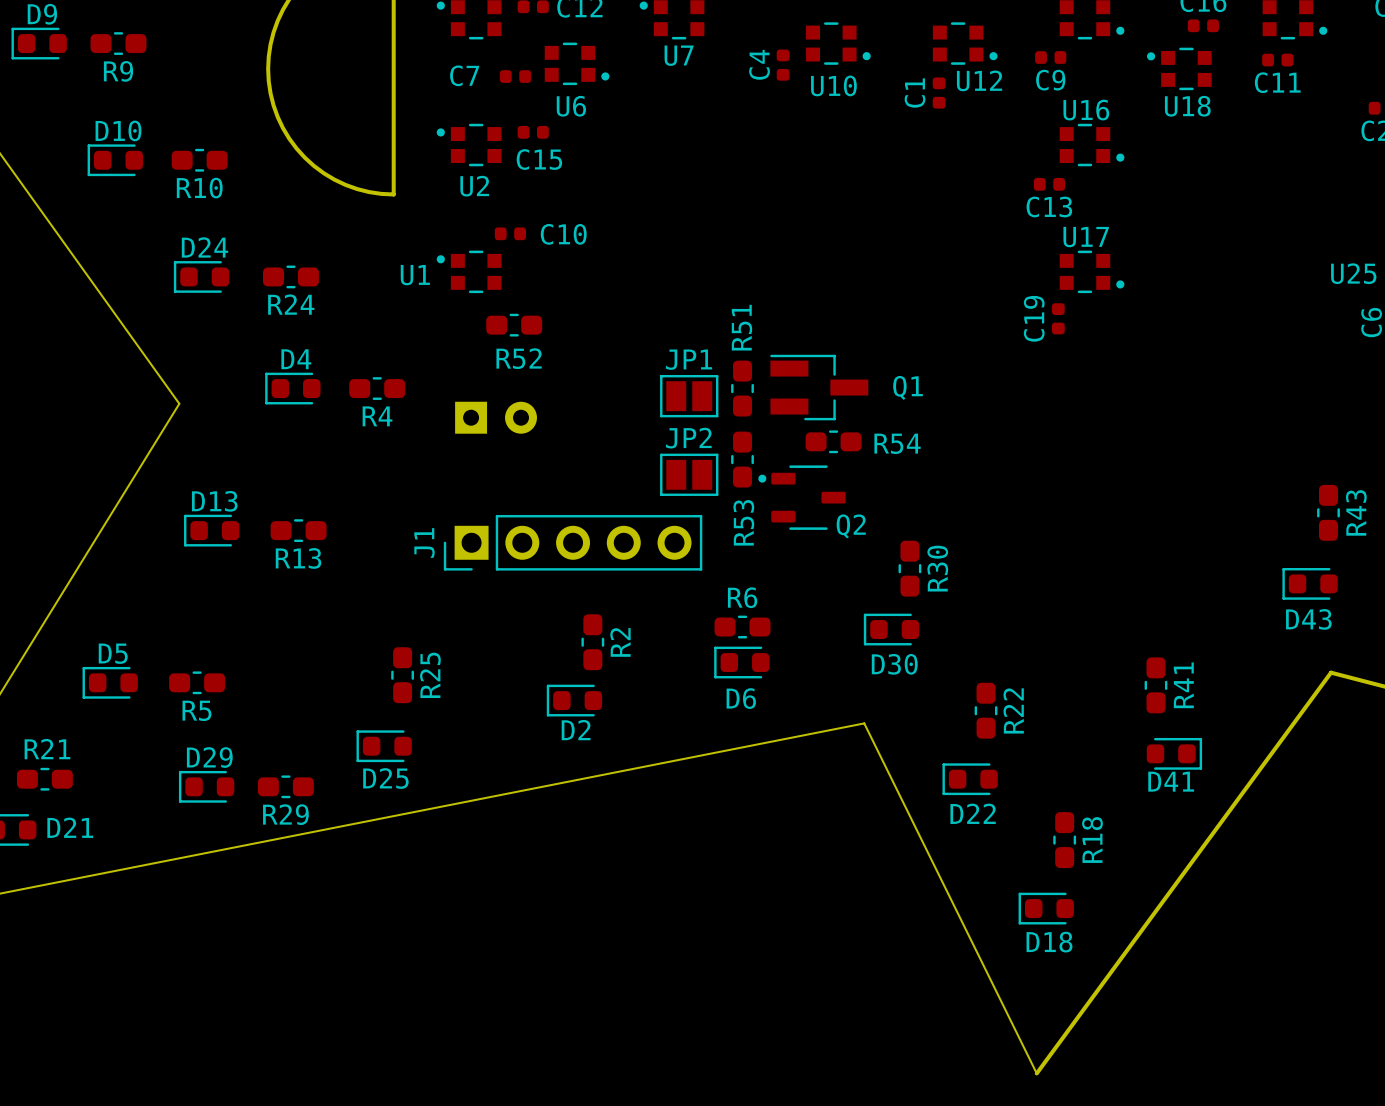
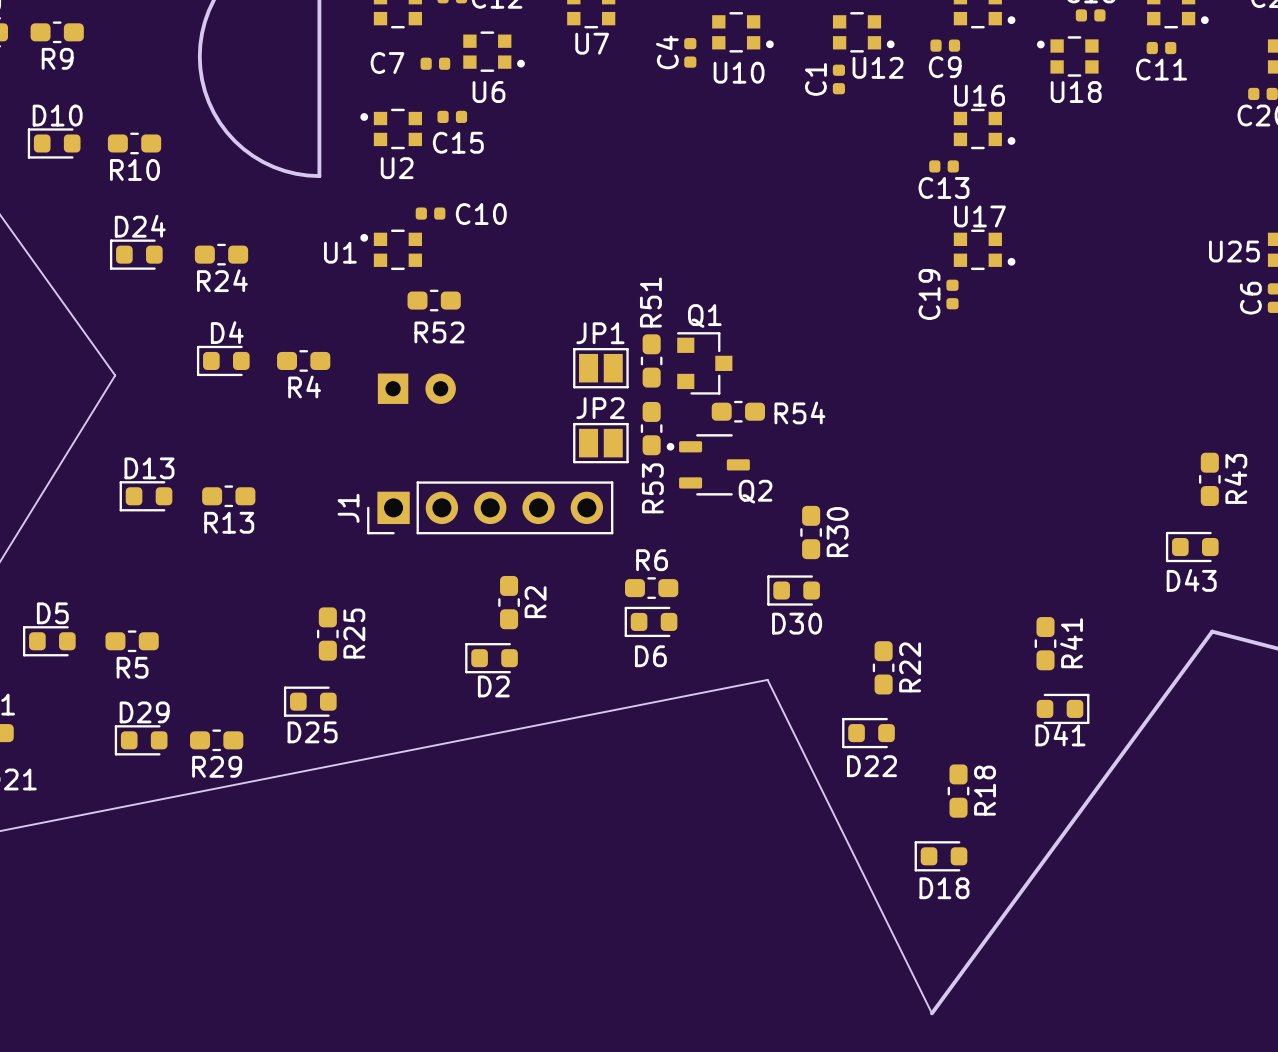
Q1 footprint: [770, 354, 869, 421] -> [677, 332, 733, 395]
Q1 name position: Q1 (908, 387) -> Q1 (704, 316)

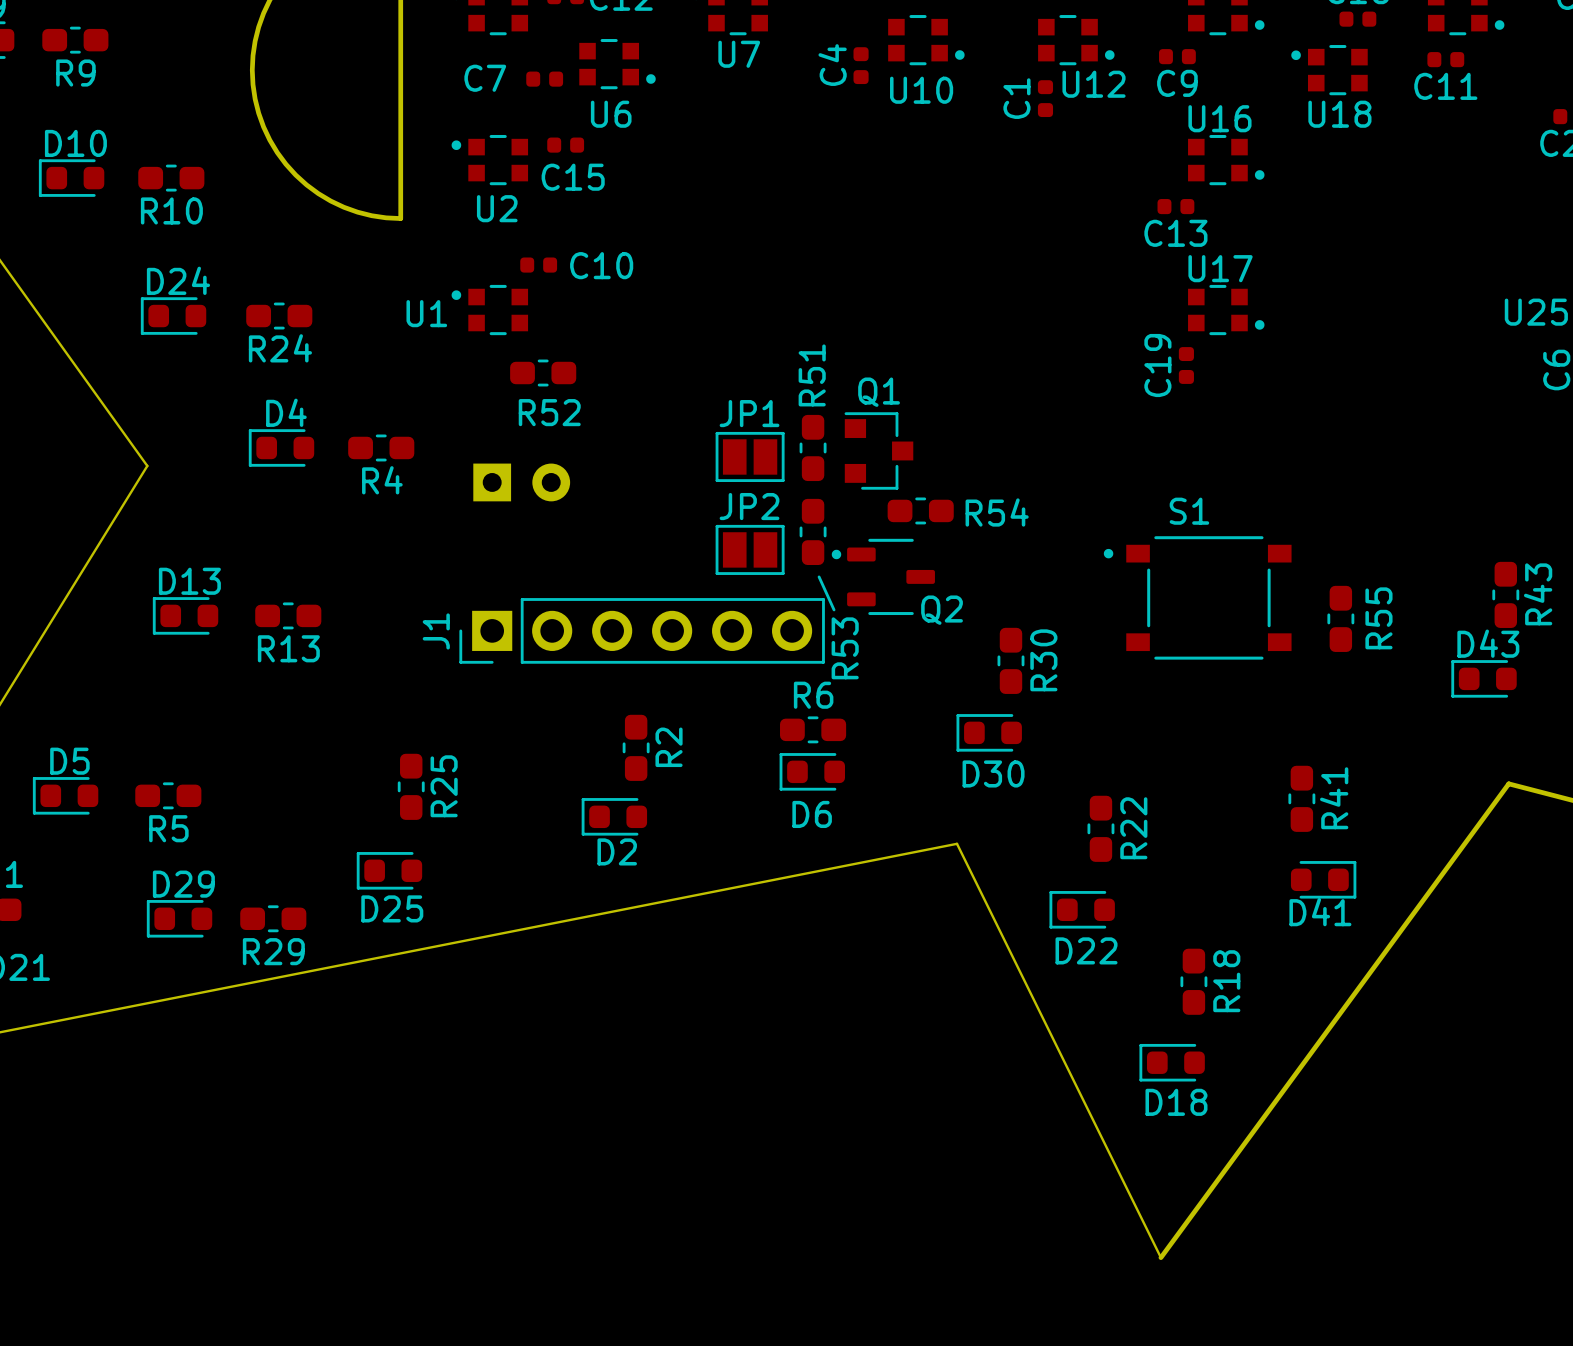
line: none -> (819, 576) (834, 609)
J1 footprint: [367, 481, 614, 535] -> [459, 598, 825, 664]
S1: none -> (1197, 597)
R53 name position: R53 (652, 488) -> R53 (845, 648)
R55: none -> (1340, 618)
D43 name position: D43 (1191, 580) -> D43 (1488, 643)

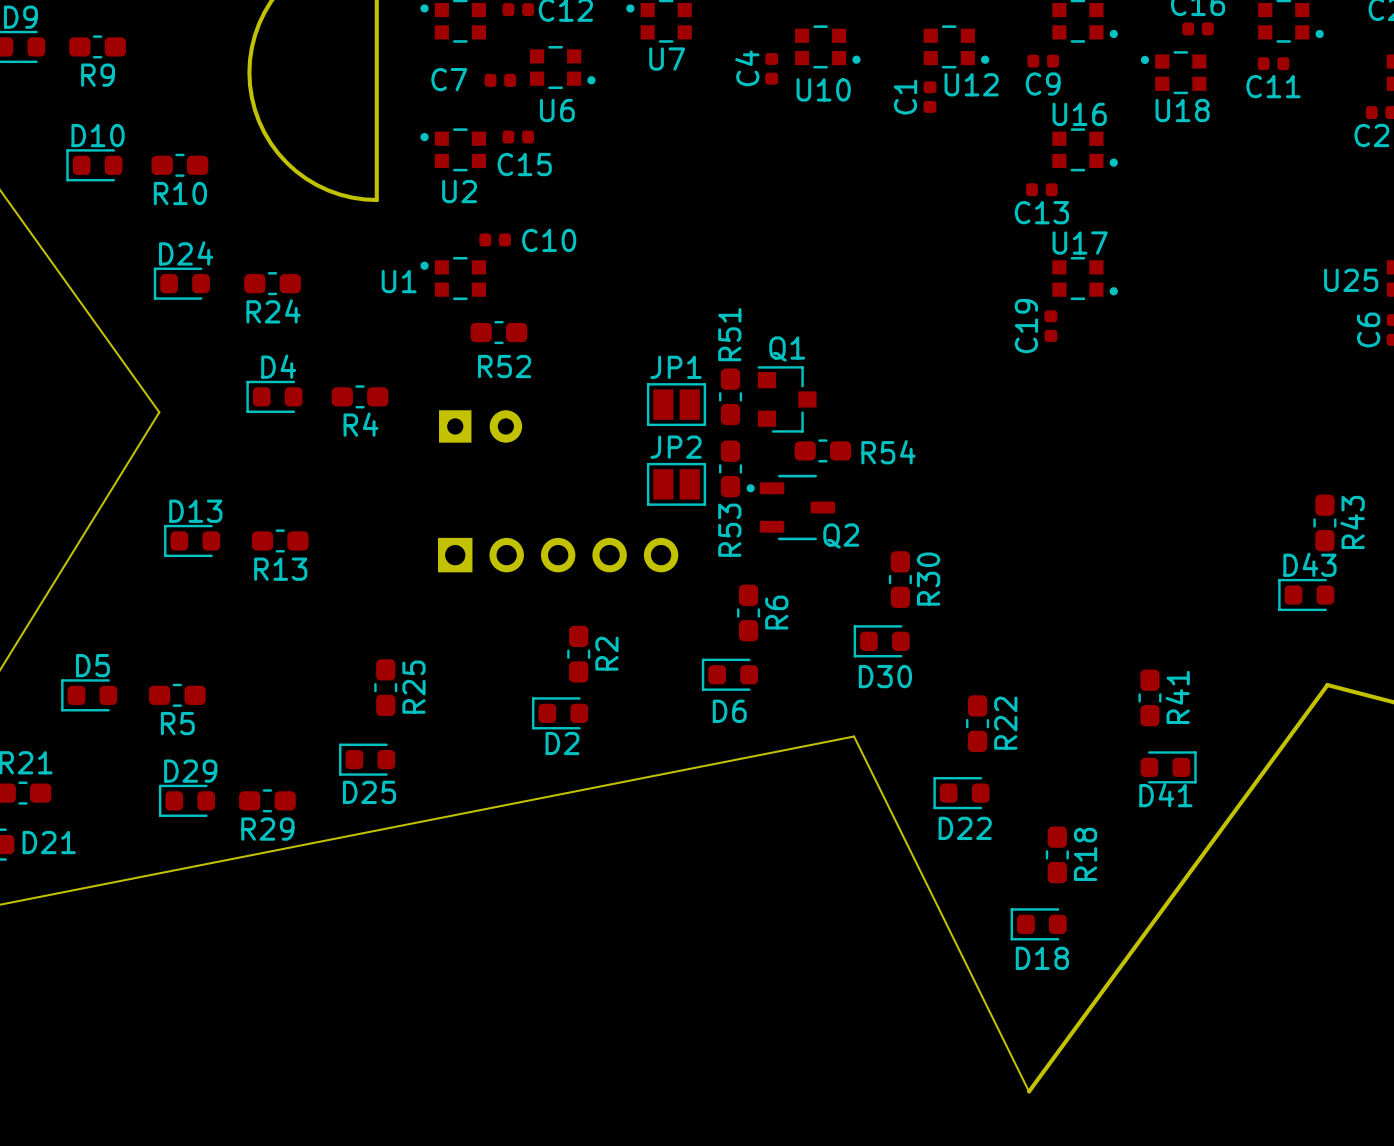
line: (819, 576) (834, 609) -> none
S1: (1197, 597) -> none
R55: (1340, 618) -> none
J1: (642, 630) -> none
part: none -> (558, 555)
R53 name position: R53 (845, 648) -> R53 (729, 530)
R6 rotation: 0° (813, 729) -> 90° clockwise (748, 613)

